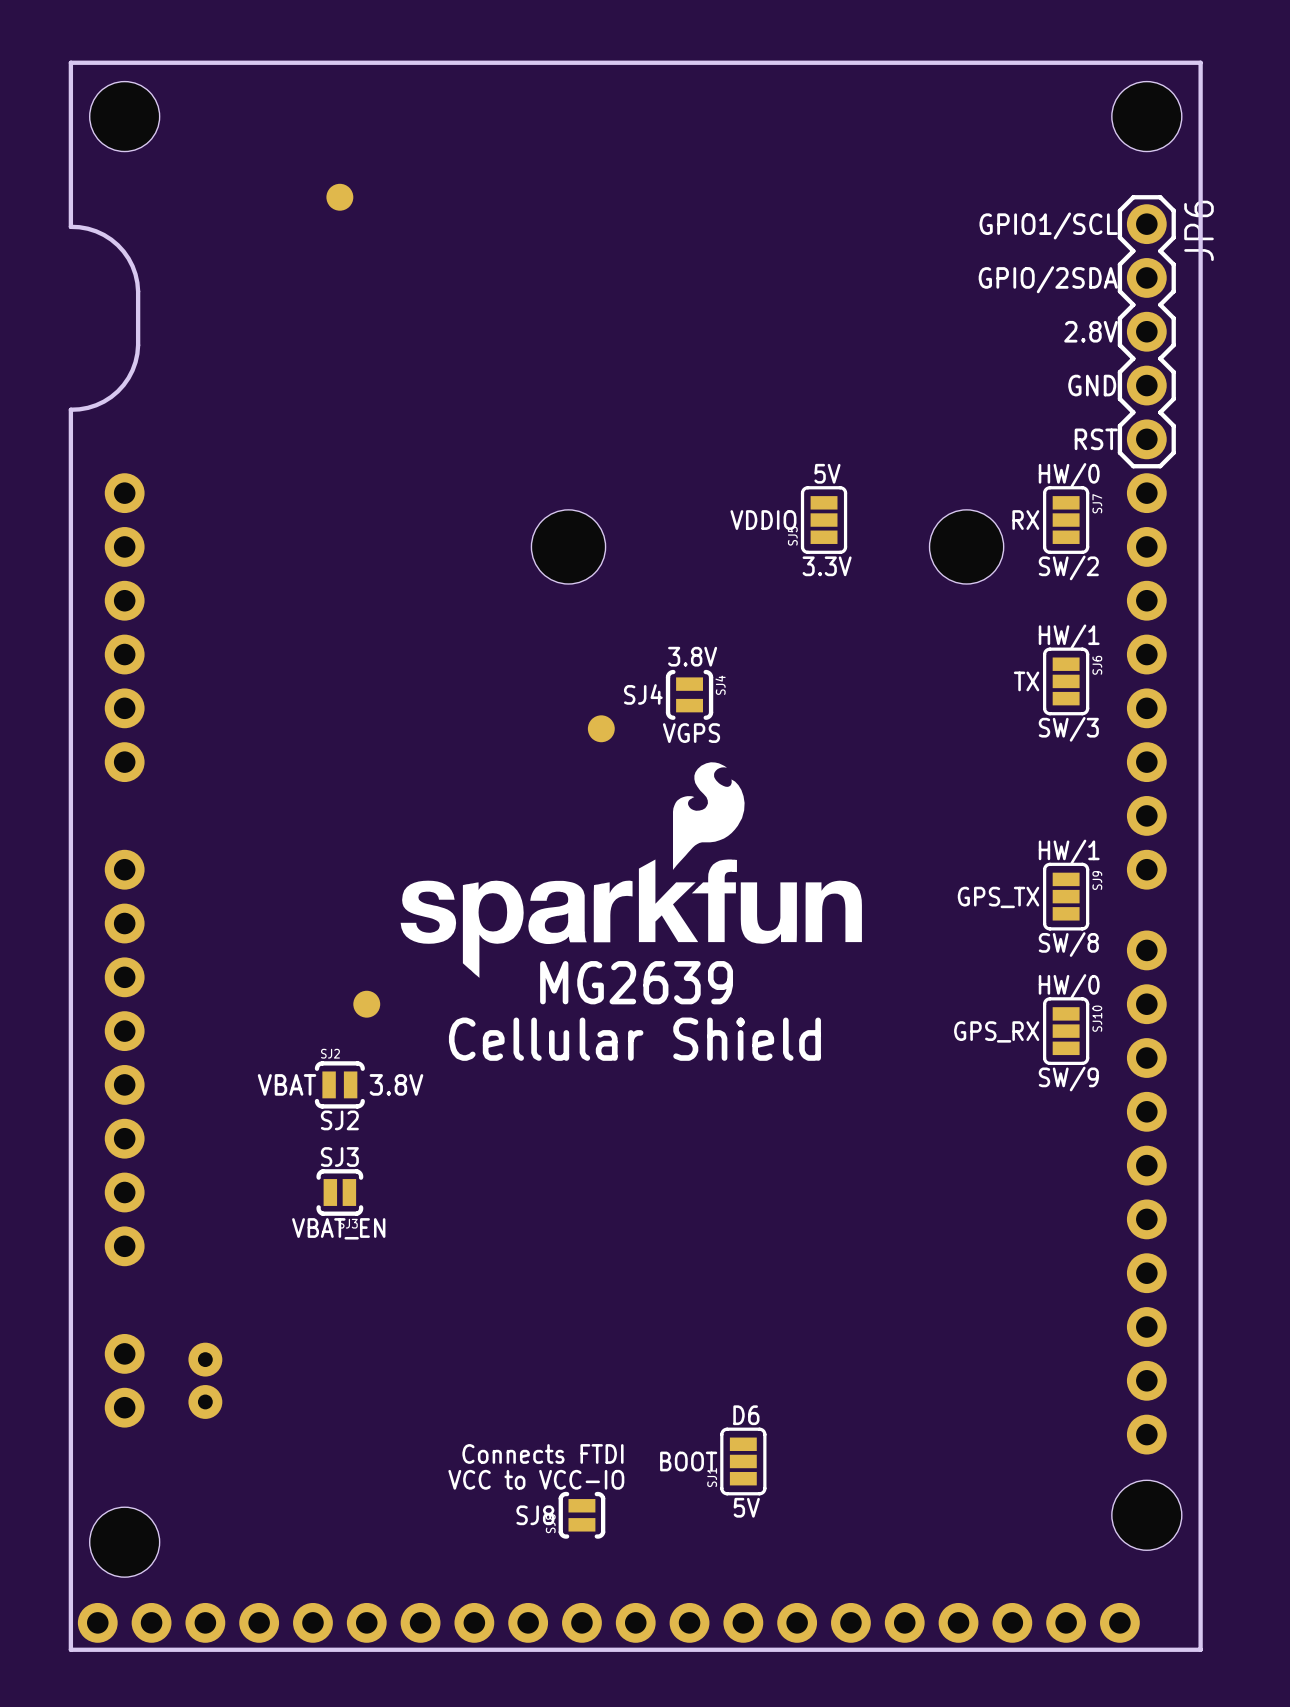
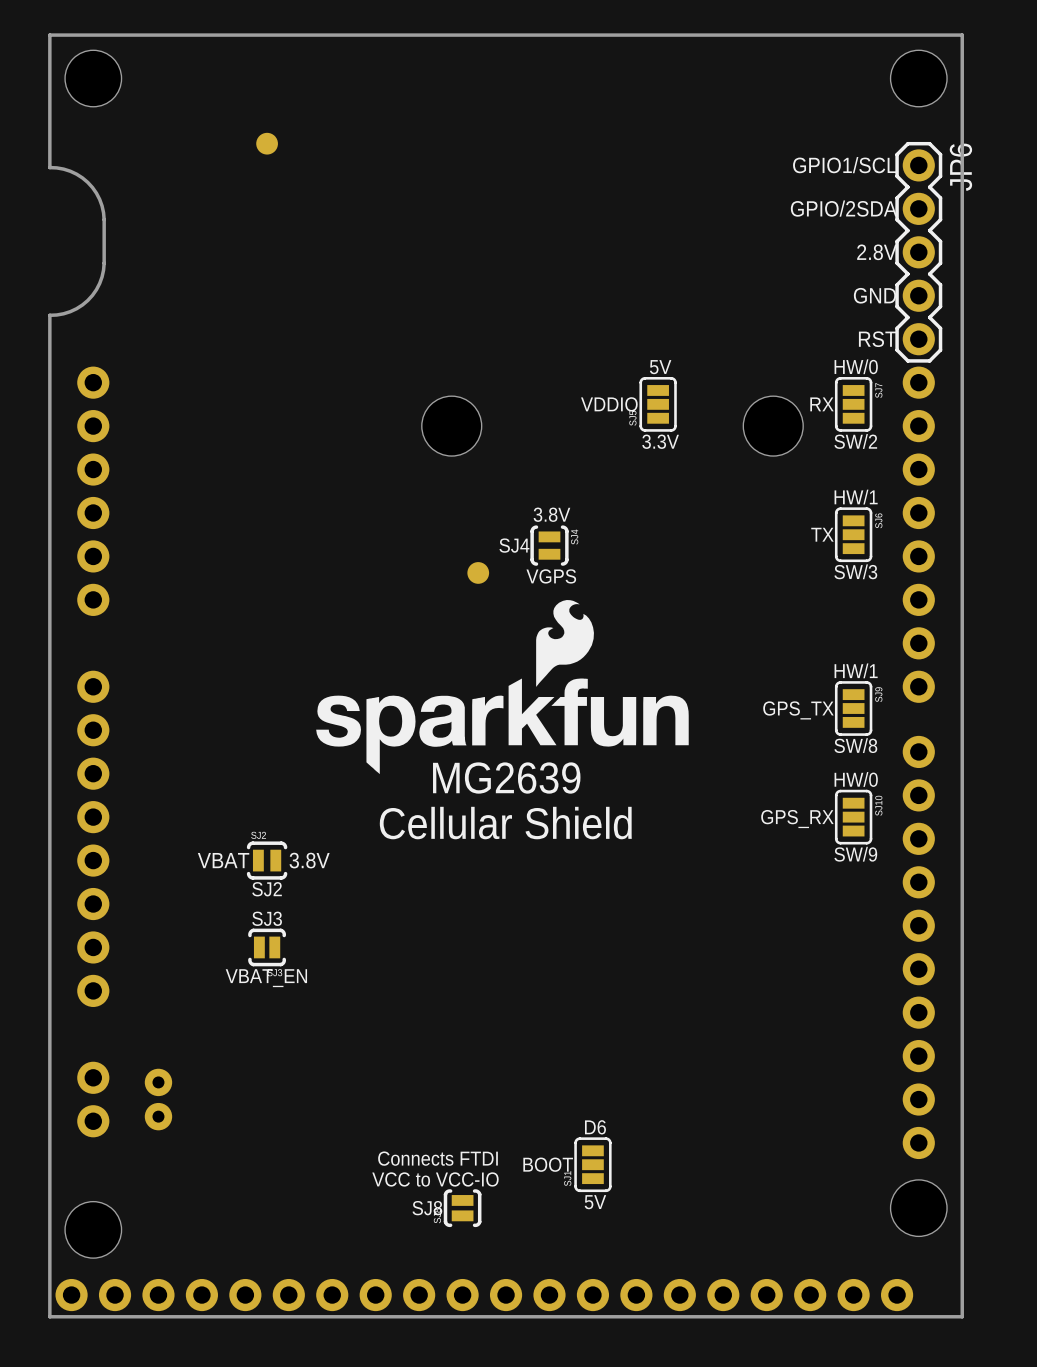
part: (366, 1004) -> none

